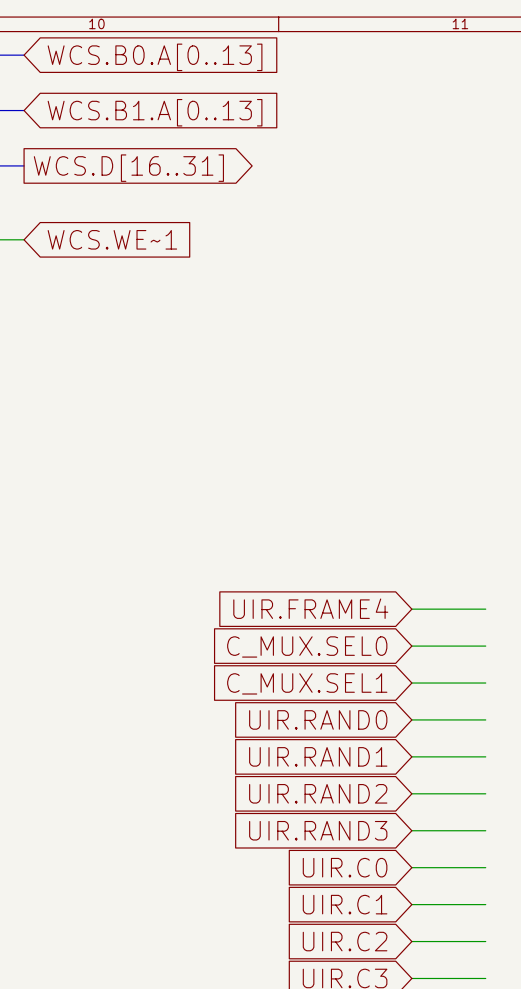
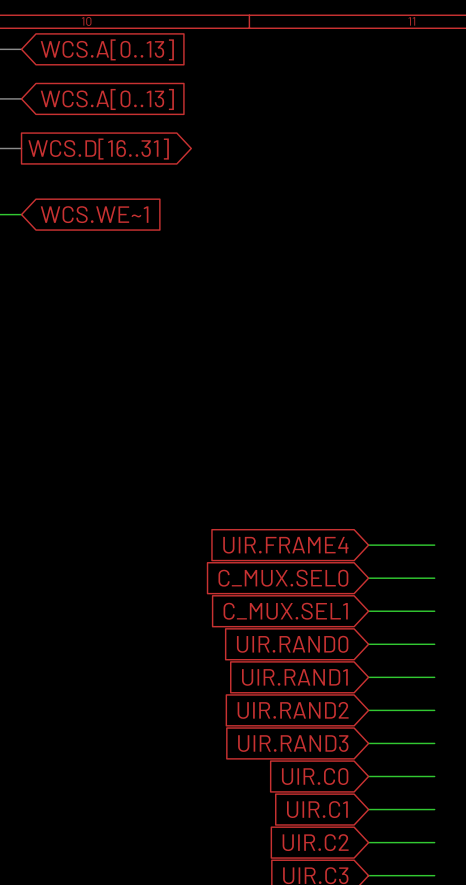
global label: WCS.B0.A[0..13] (155, 57) -> WCS.A[0..13] (107, 49)
global label: WCS.B1.A[0..13] (155, 112) -> WCS.A[0..13] (107, 99)

